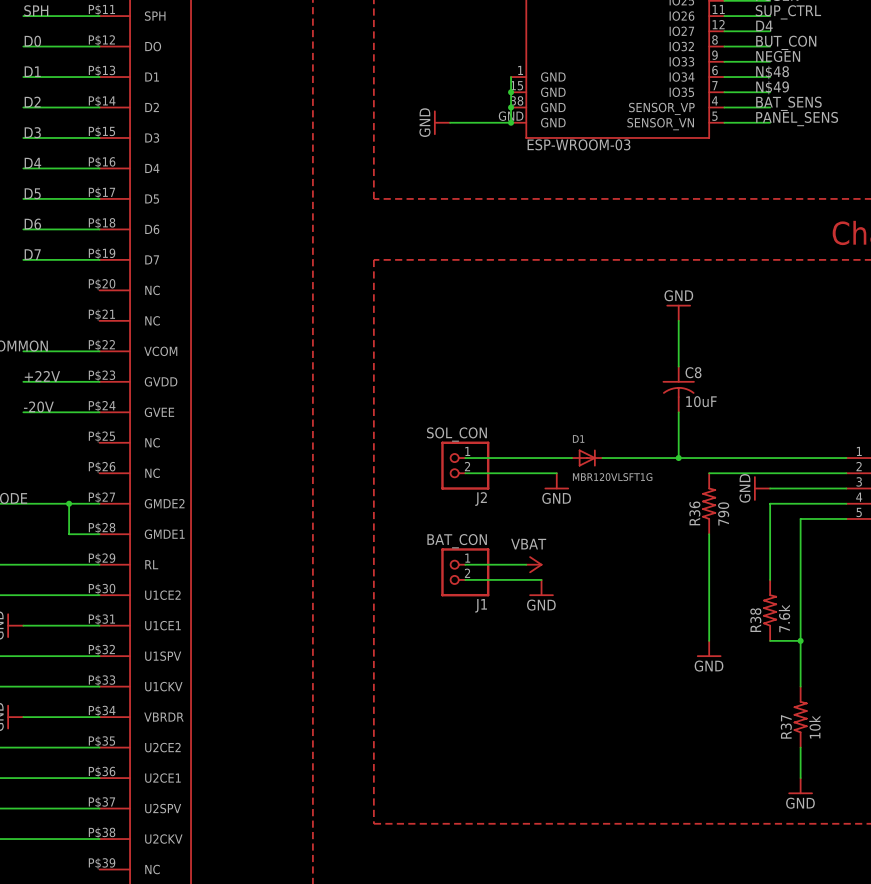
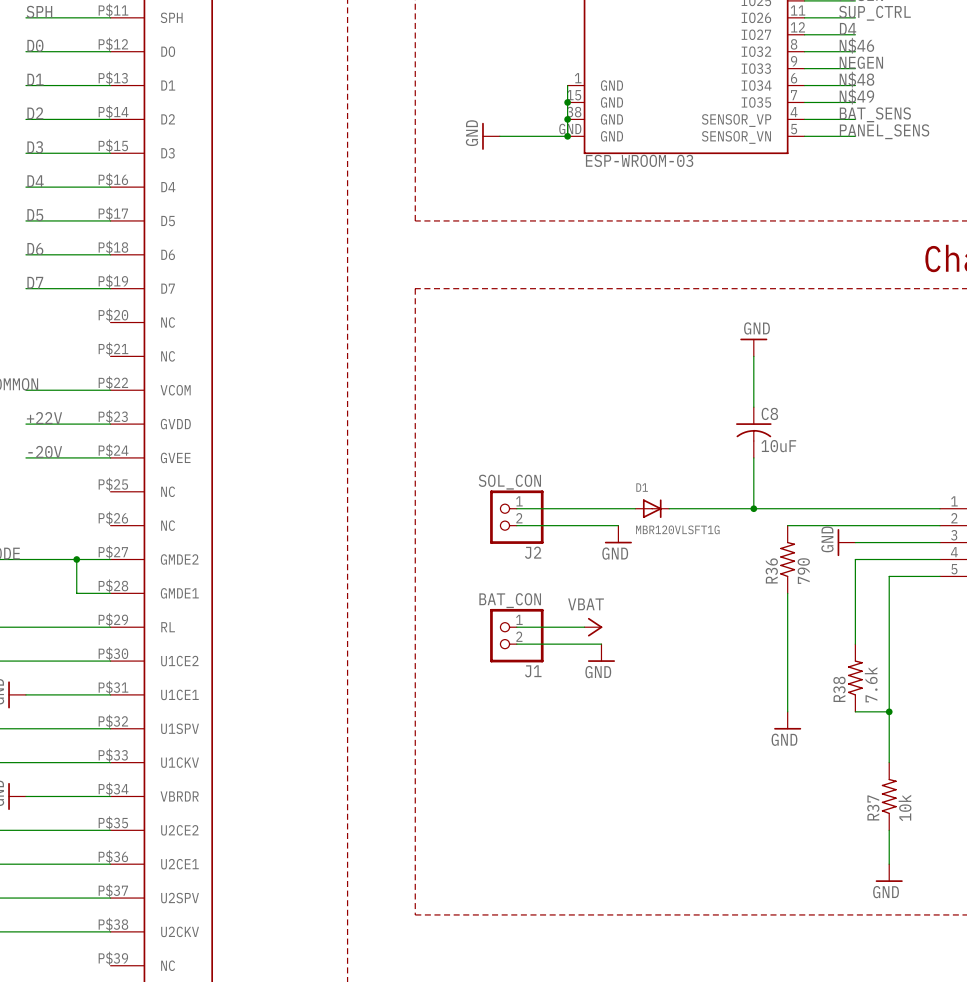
label: BUT_CON (786, 42) -> N$46 (856, 45)

